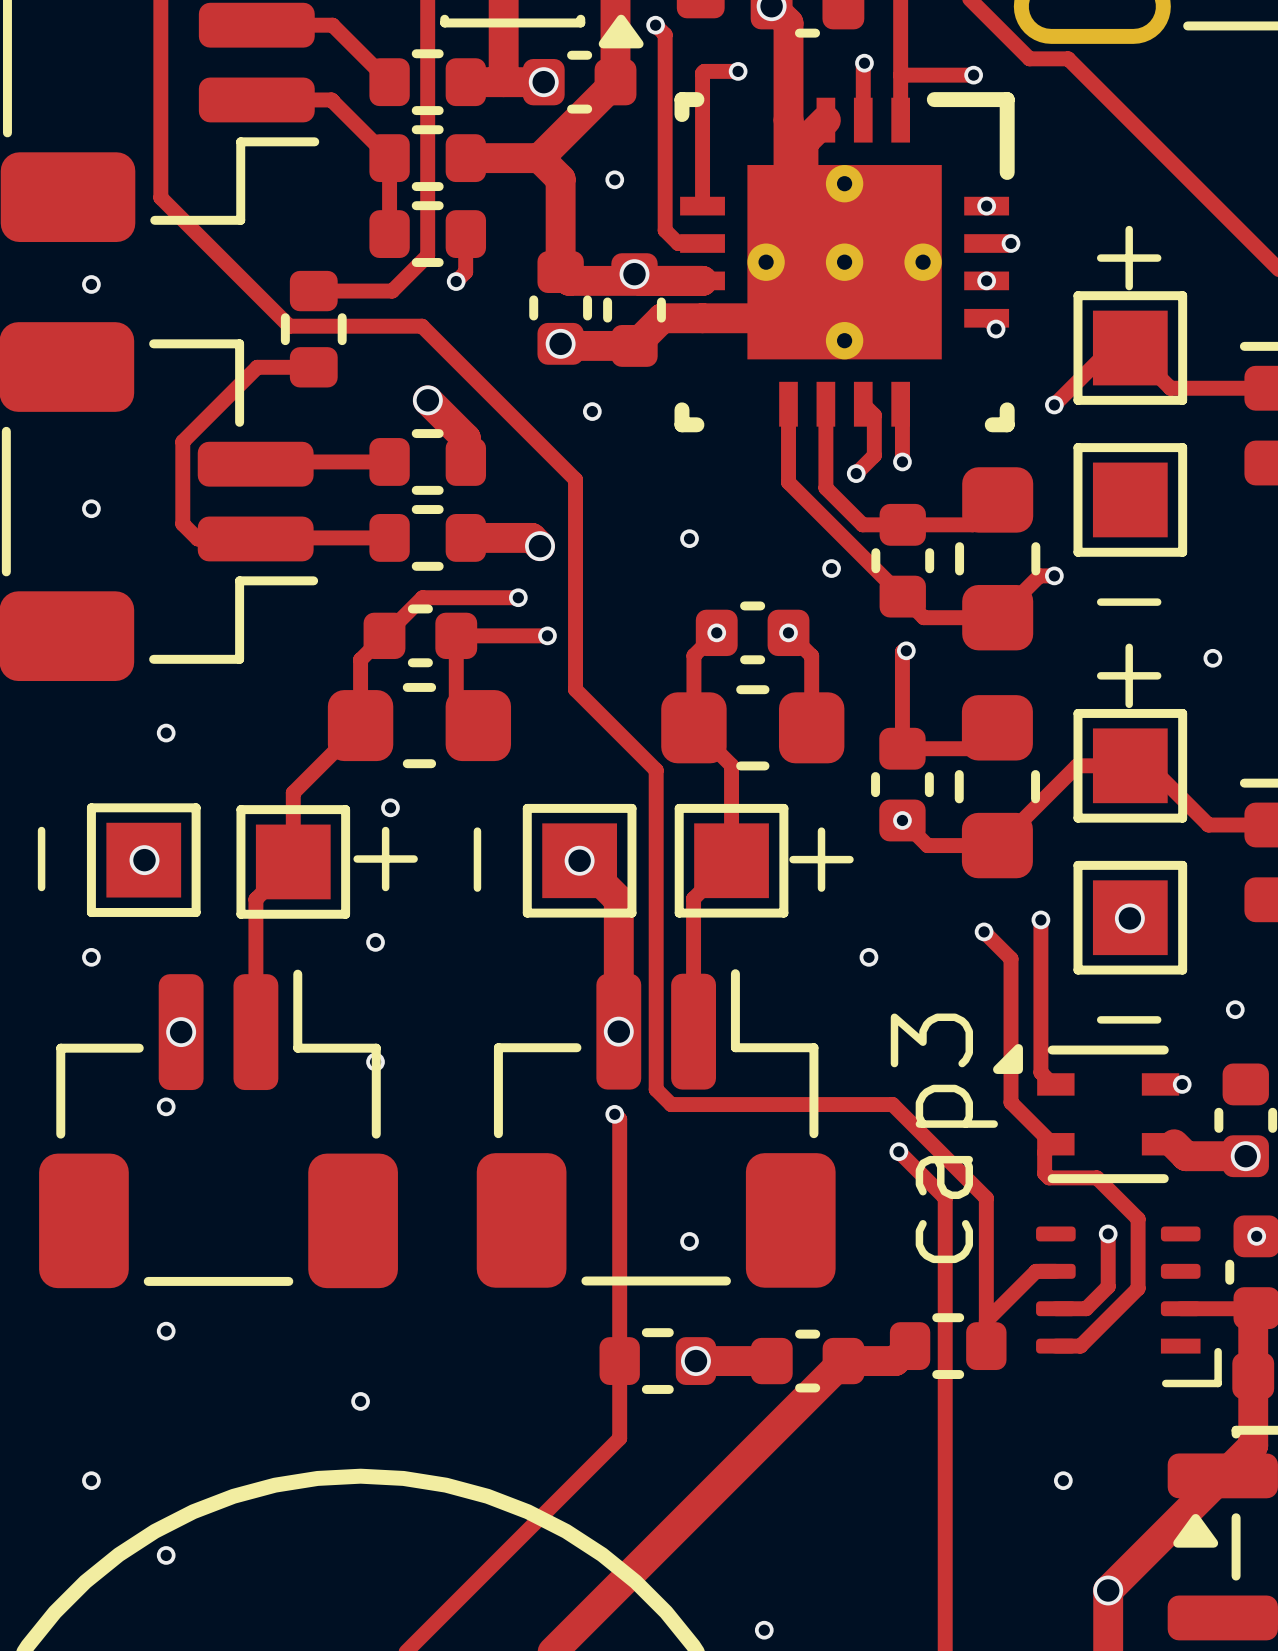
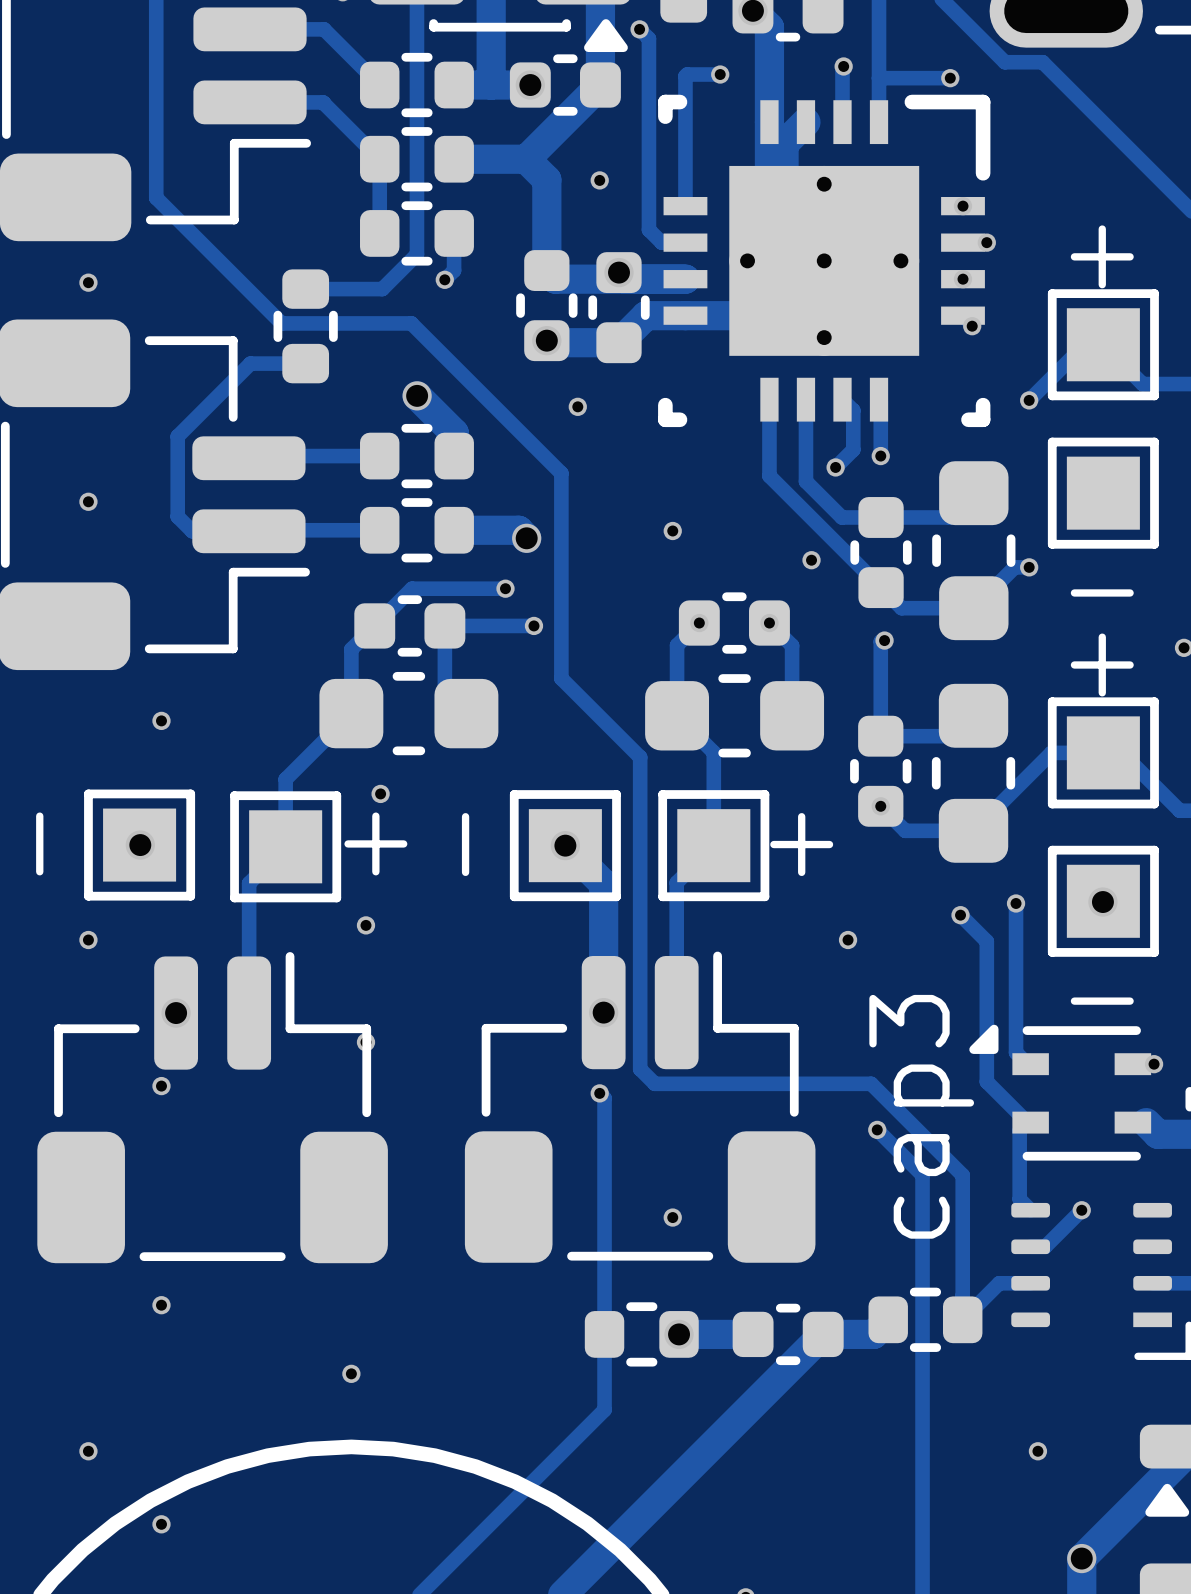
track: (1044, 1173) (1049, 1177) (1096, 1177) (1138, 1219) (1138, 1288) (1080, 1346) (1055, 1346) -> (1019, 1151) (1019, 1199) (1030, 1210)
track: (1108, 1233) (1108, 1286) (1086, 1308) (1055, 1308) -> (1081, 1210) (1045, 1246) (1030, 1246)
track: (1055, 1271) (1036, 1271) (986, 1321) -> none
track: none -> (1030, 1283) (999, 1283) (962, 1319)

